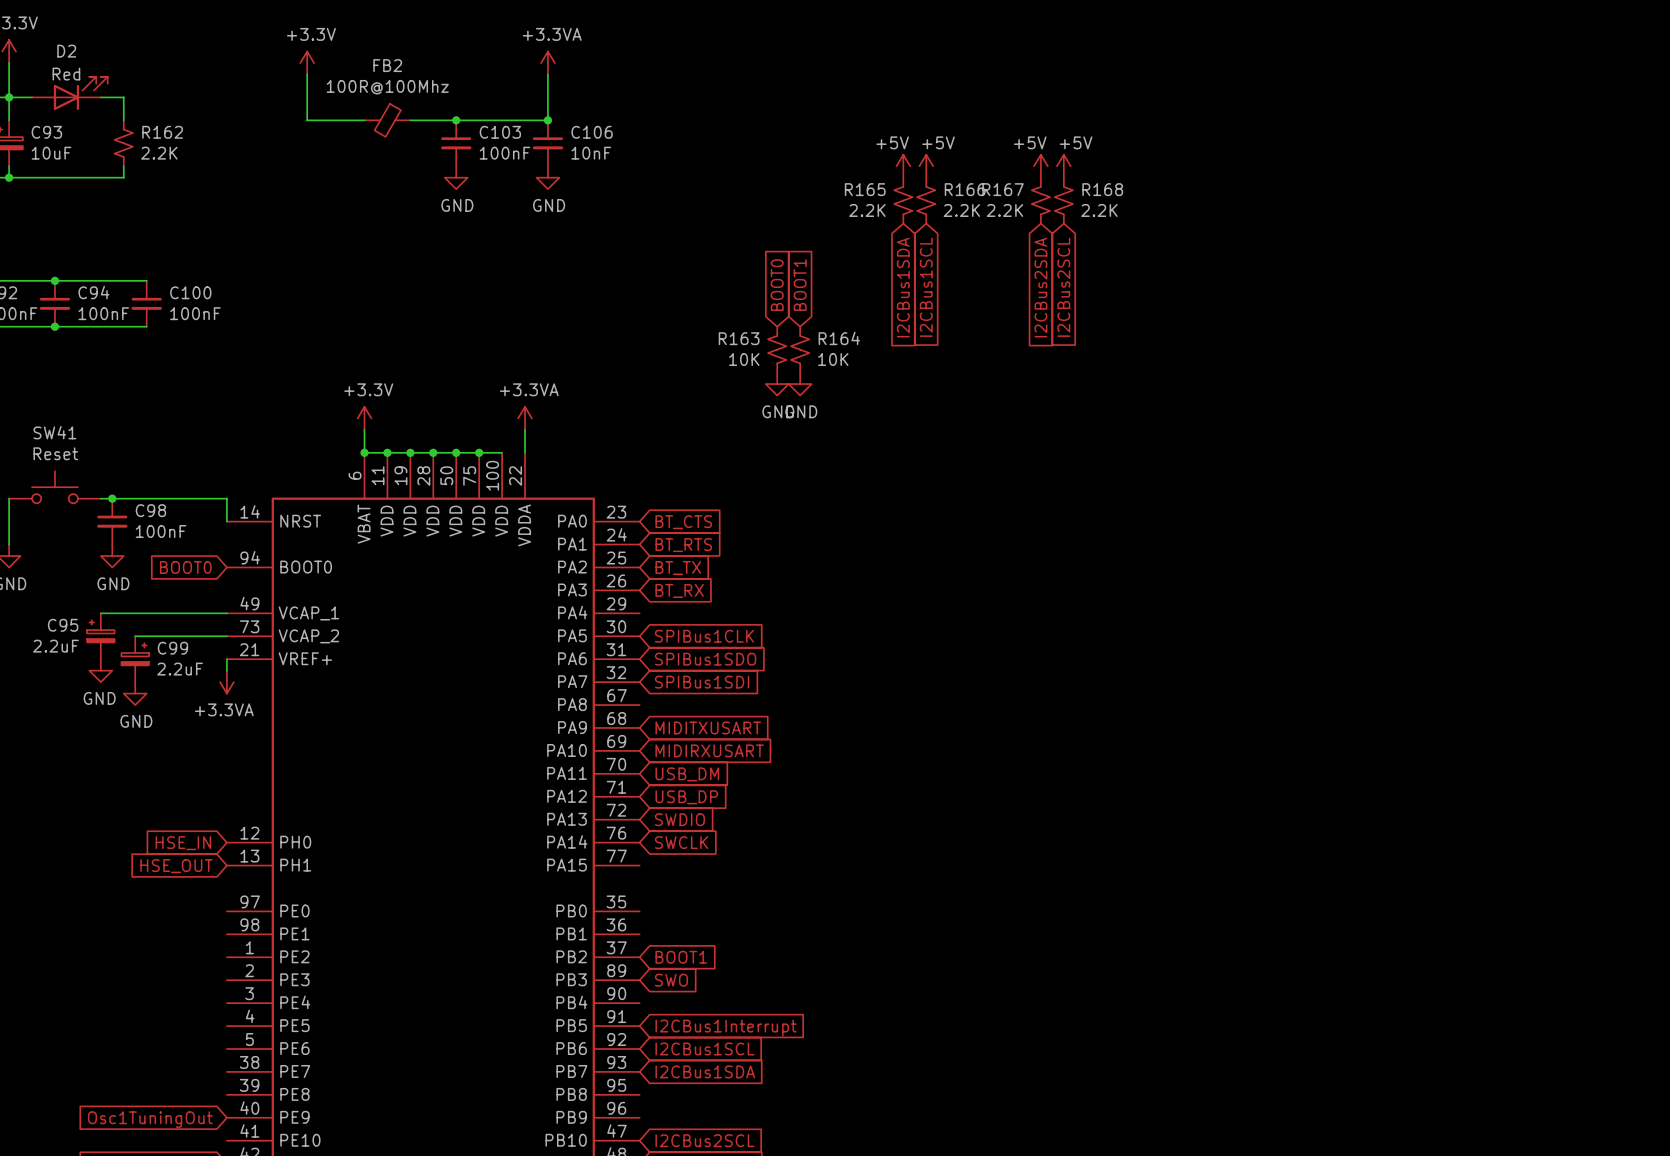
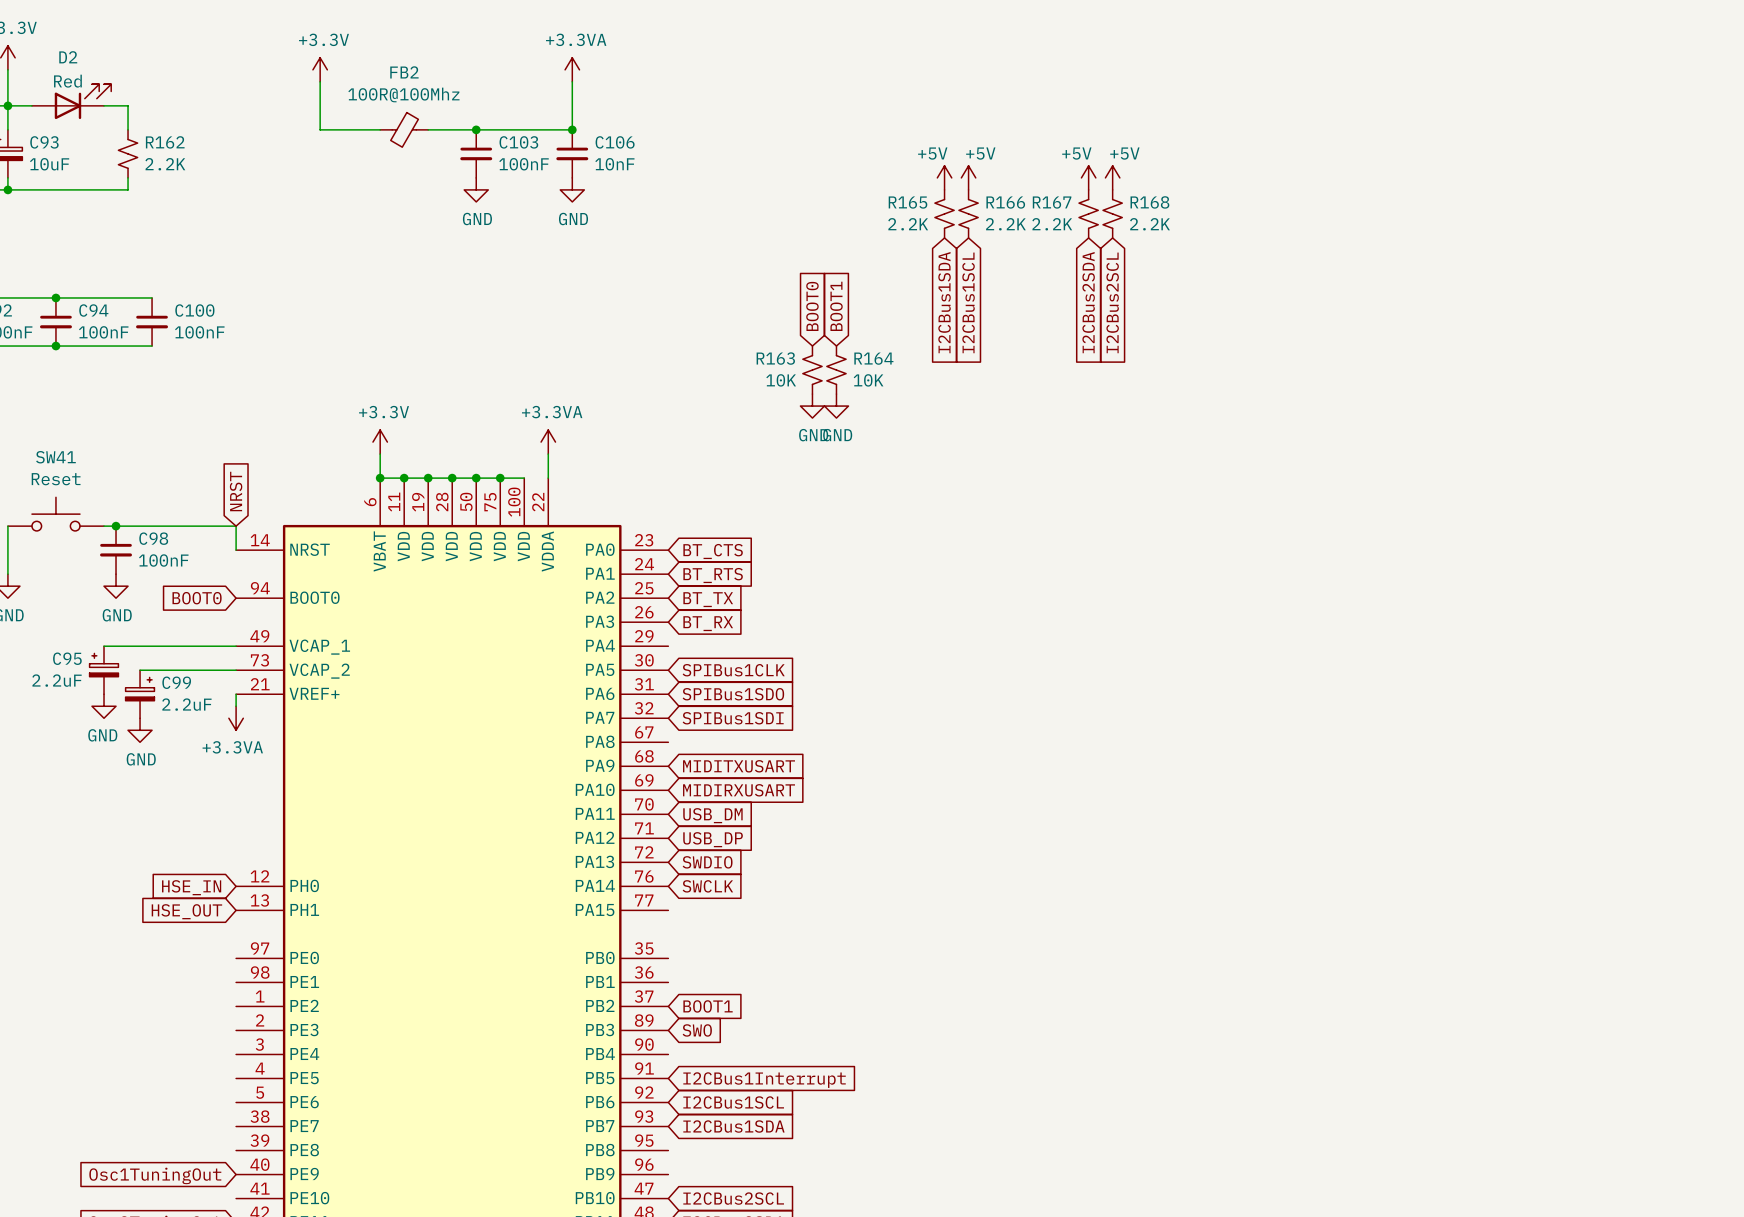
global label: none -> NRST (236, 491)

